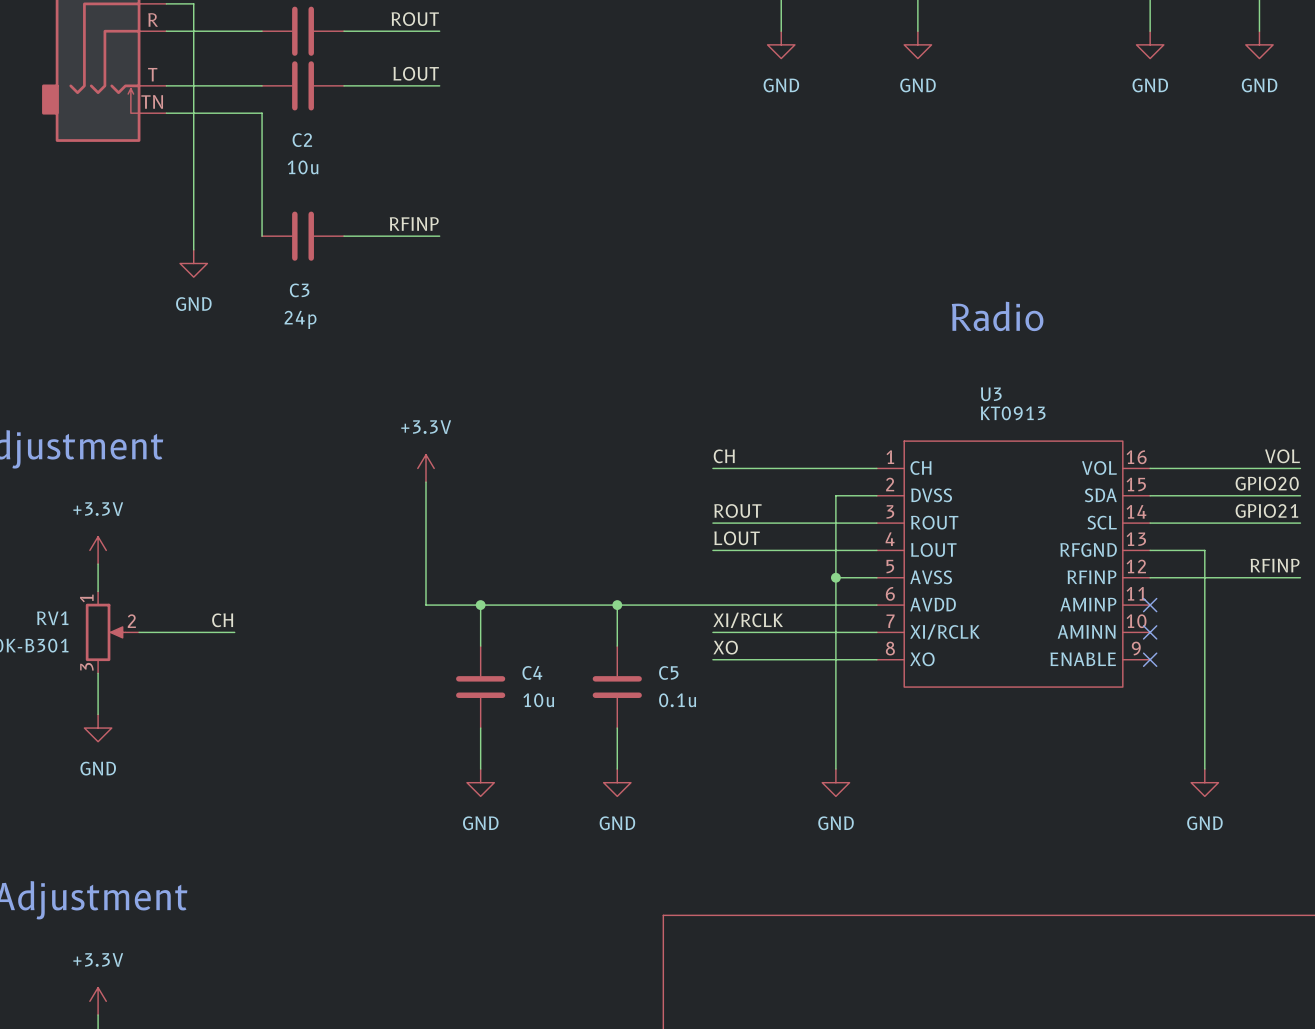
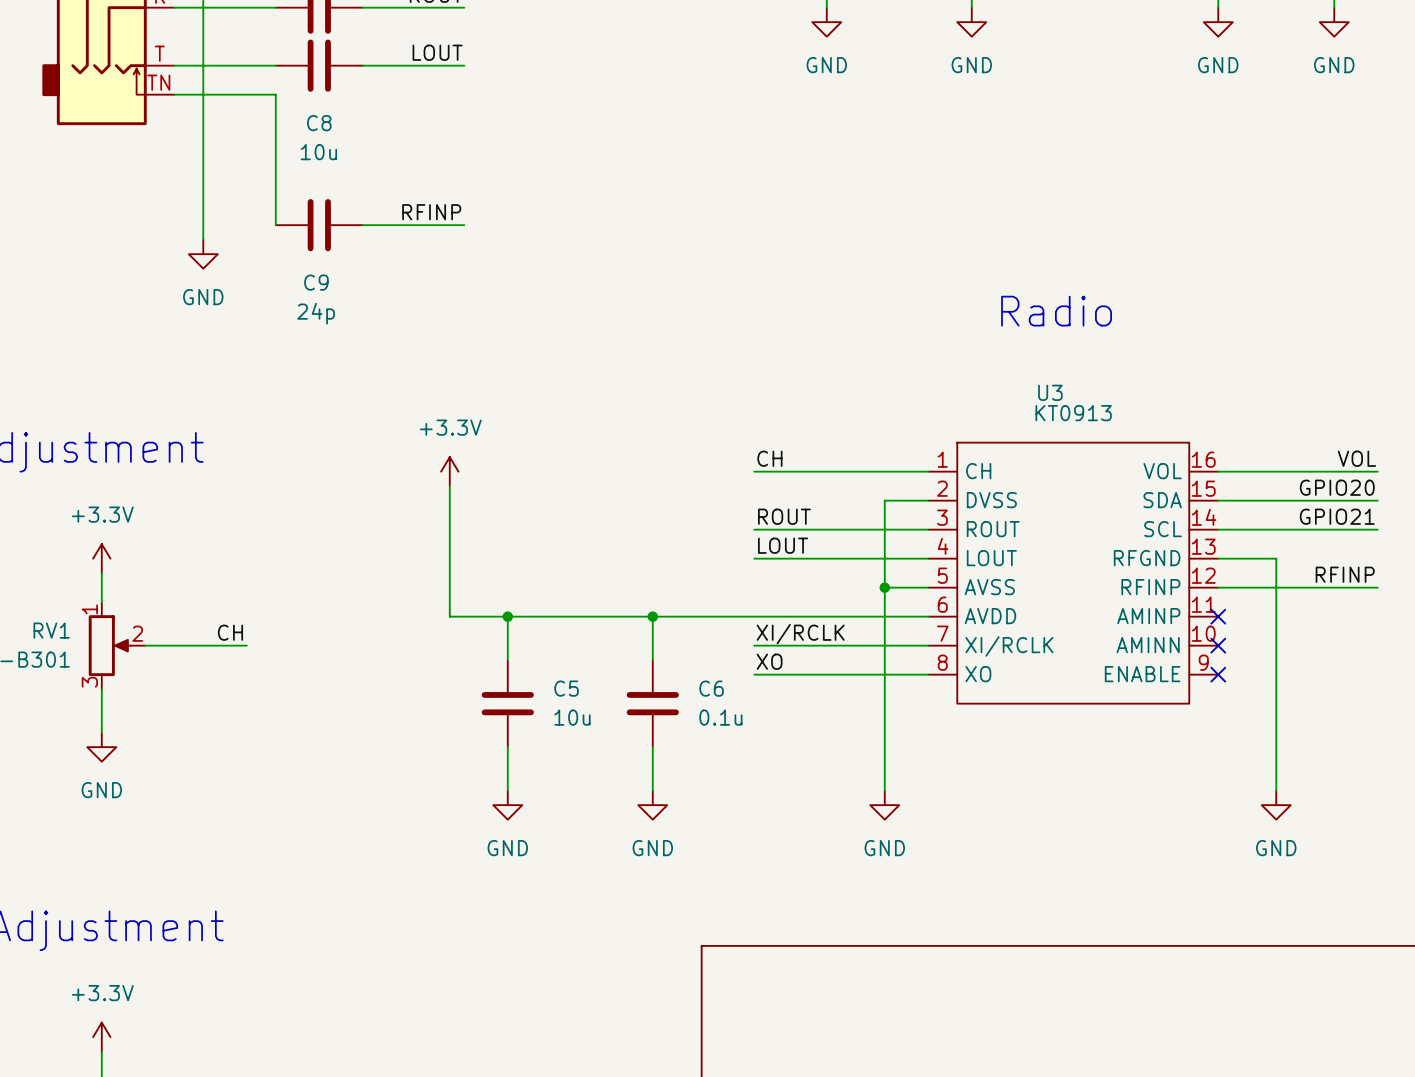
C2 name: C2 (302, 140) -> C8 (319, 123)
C3 name: C3 (299, 290) -> C9 (316, 282)
C4 name: C4 (532, 672) -> C5 (566, 688)
C5 name: C5 (668, 672) -> C6 (711, 688)

